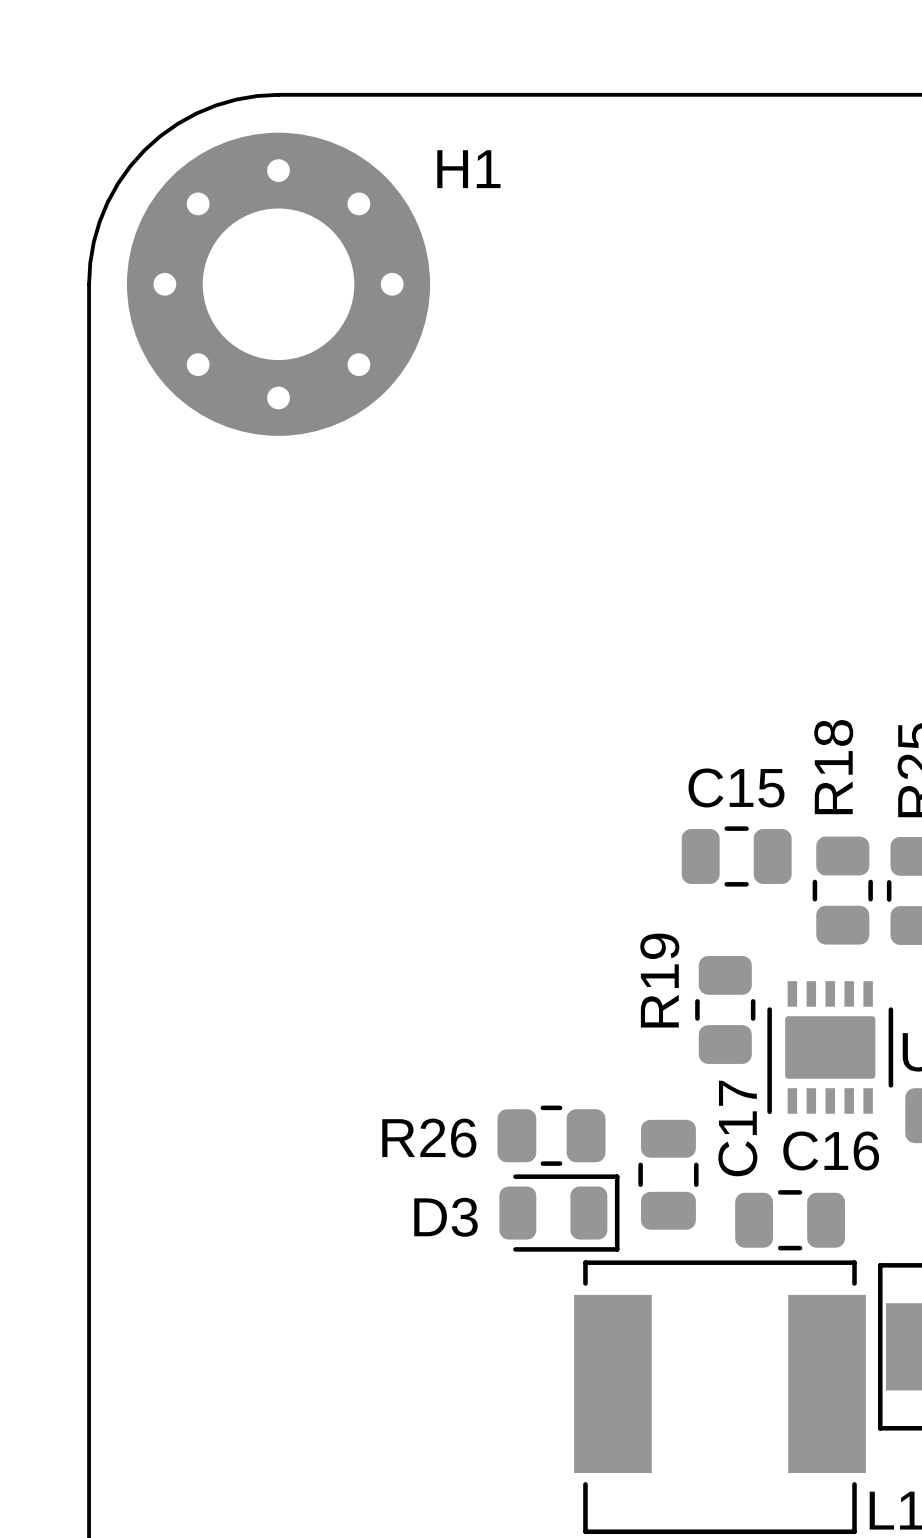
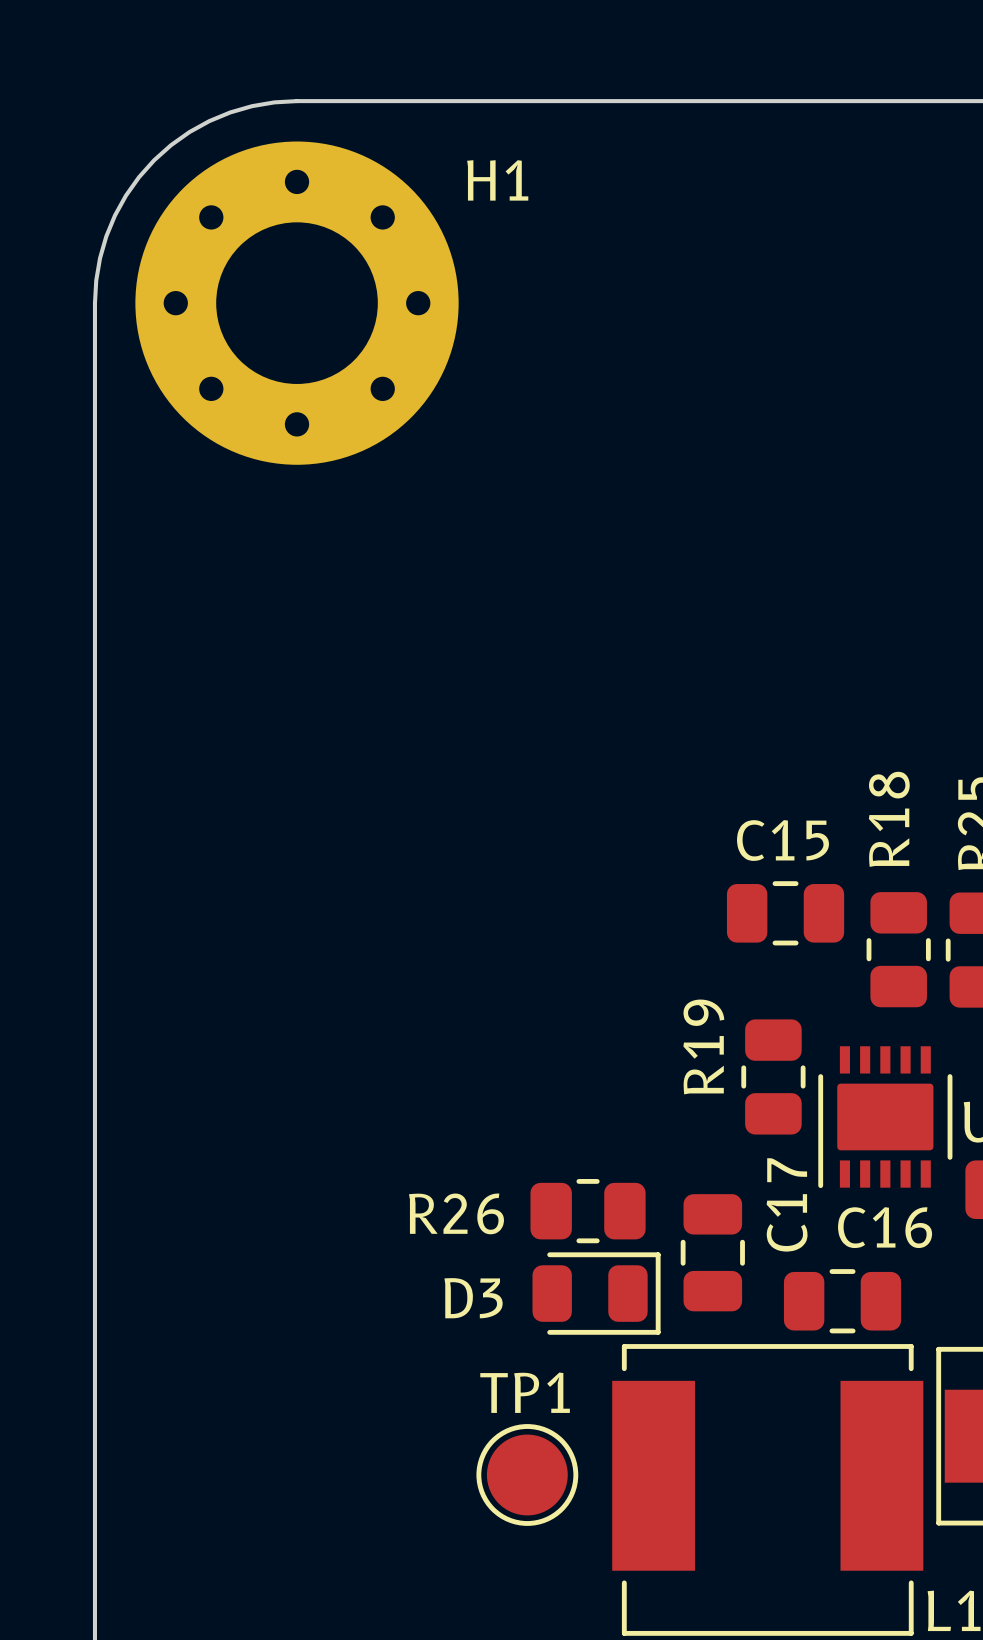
TP1: none -> (527, 1474)

